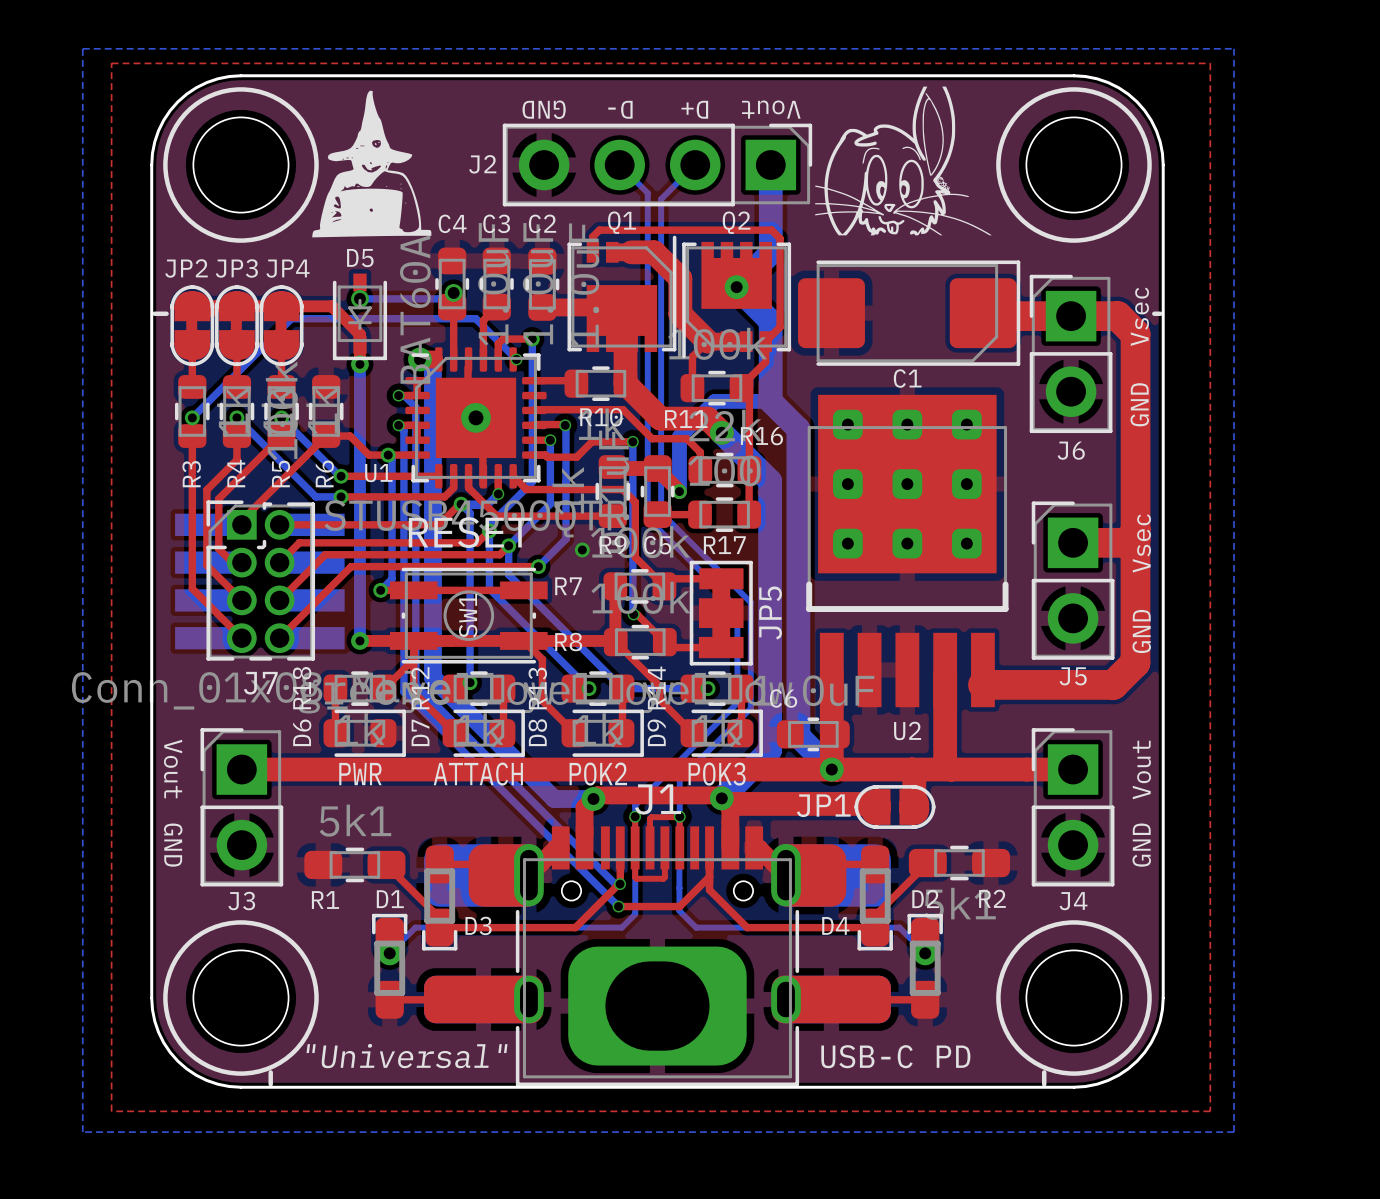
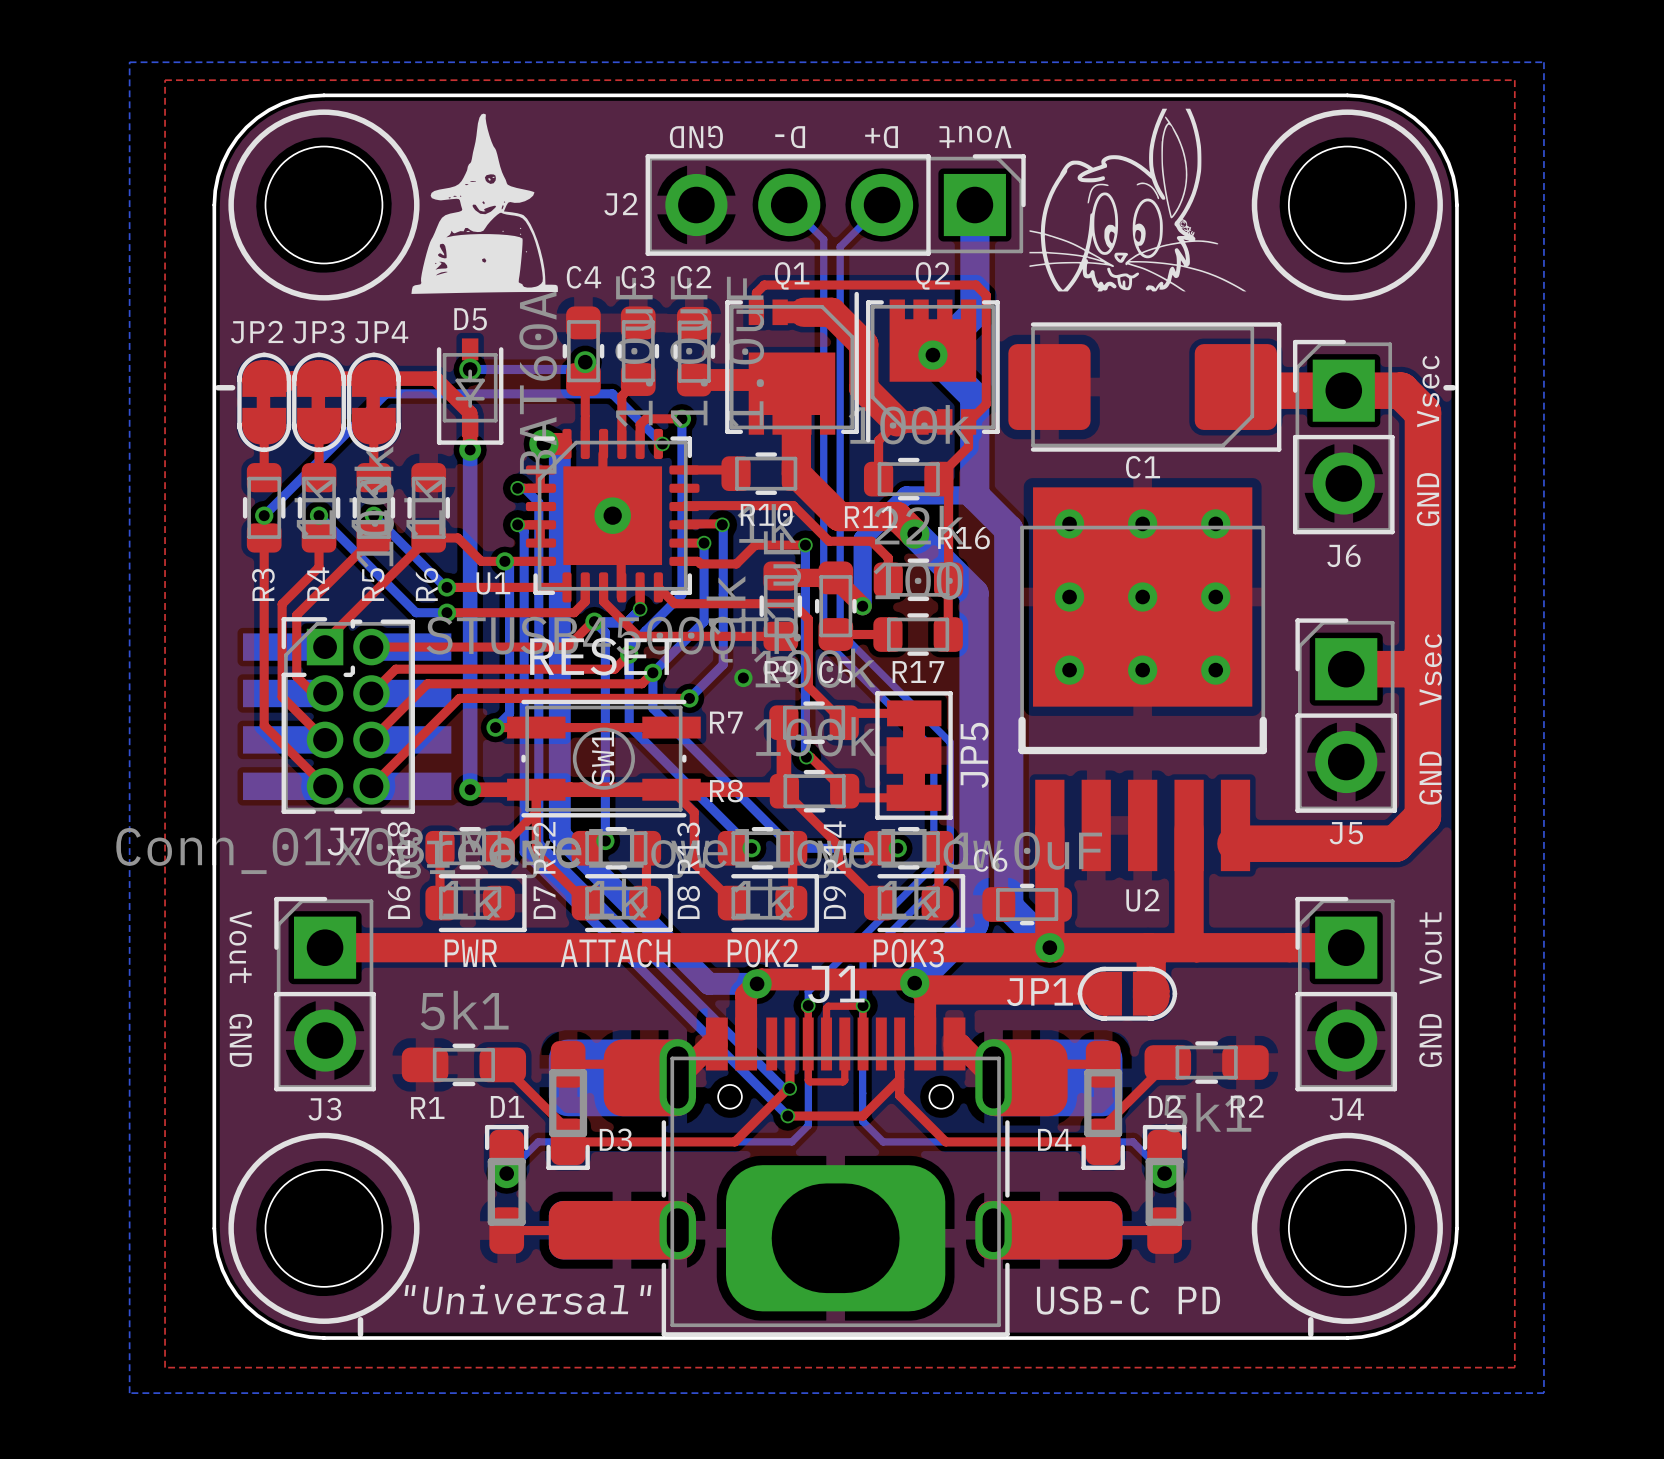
U2 footprint: [806, 394, 1009, 708] -> [1018, 487, 1267, 872]
via: none -> (1069, 523)
via: none -> (1142, 523)
via: none -> (1215, 523)
via: none -> (1069, 597)
via: none -> (1142, 597)
via: none -> (1215, 597)
via: none -> (1069, 670)
via: none -> (1142, 670)
via: none -> (1215, 670)

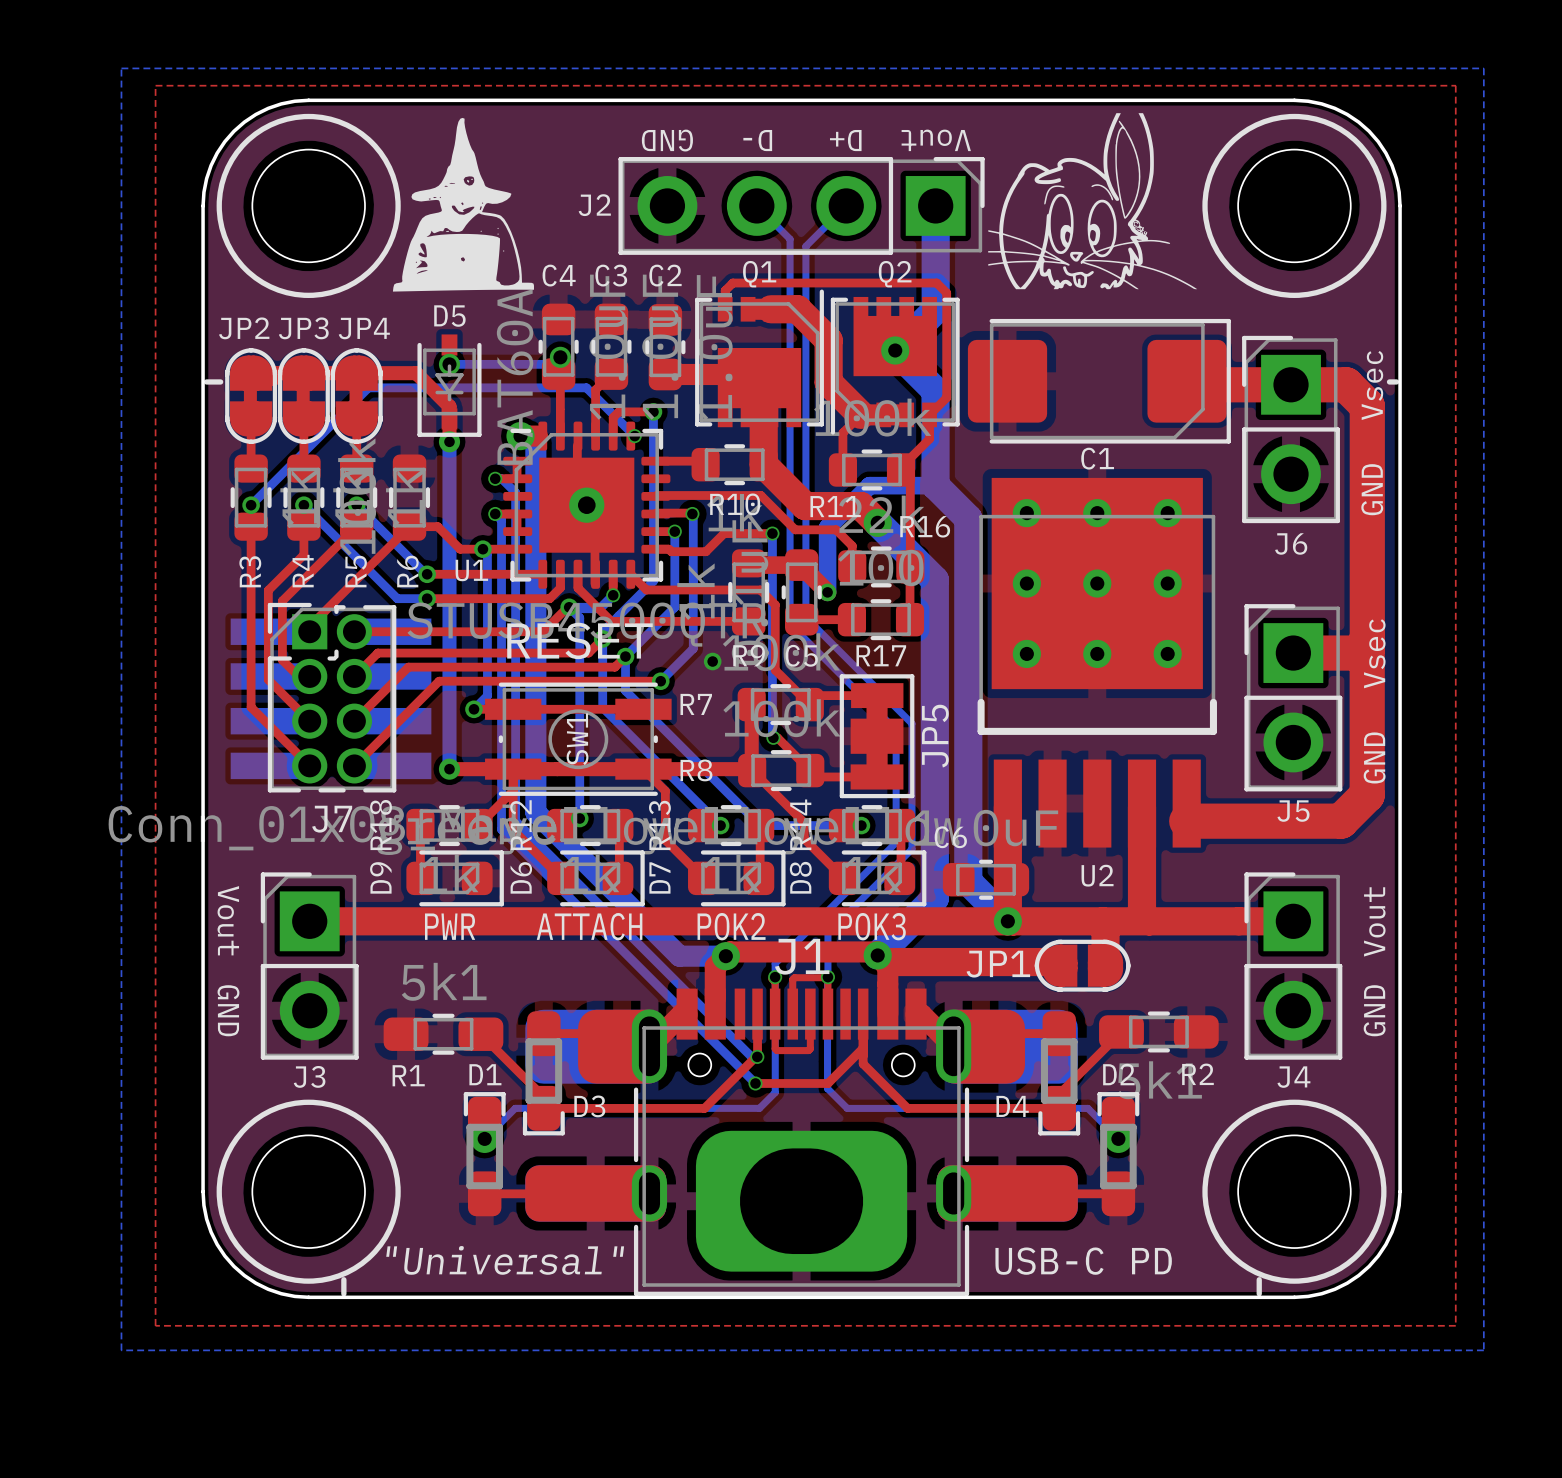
D6 name: D6 (399, 902) -> D9 (380, 877)
D7 name: D7 (544, 902) -> D6 (521, 877)
D8 name: D8 (688, 902) -> D7 (659, 877)
D9 name: D9 (834, 902) -> D8 (800, 877)

